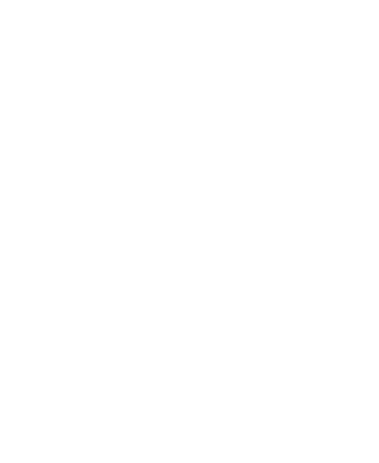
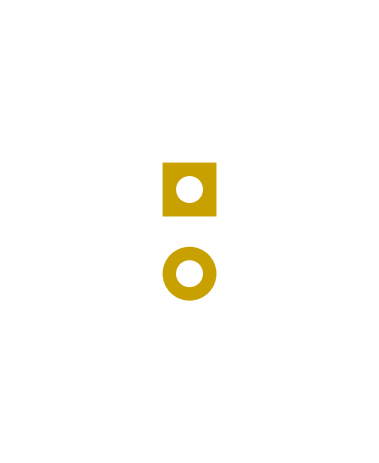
part: none -> (189, 231)

